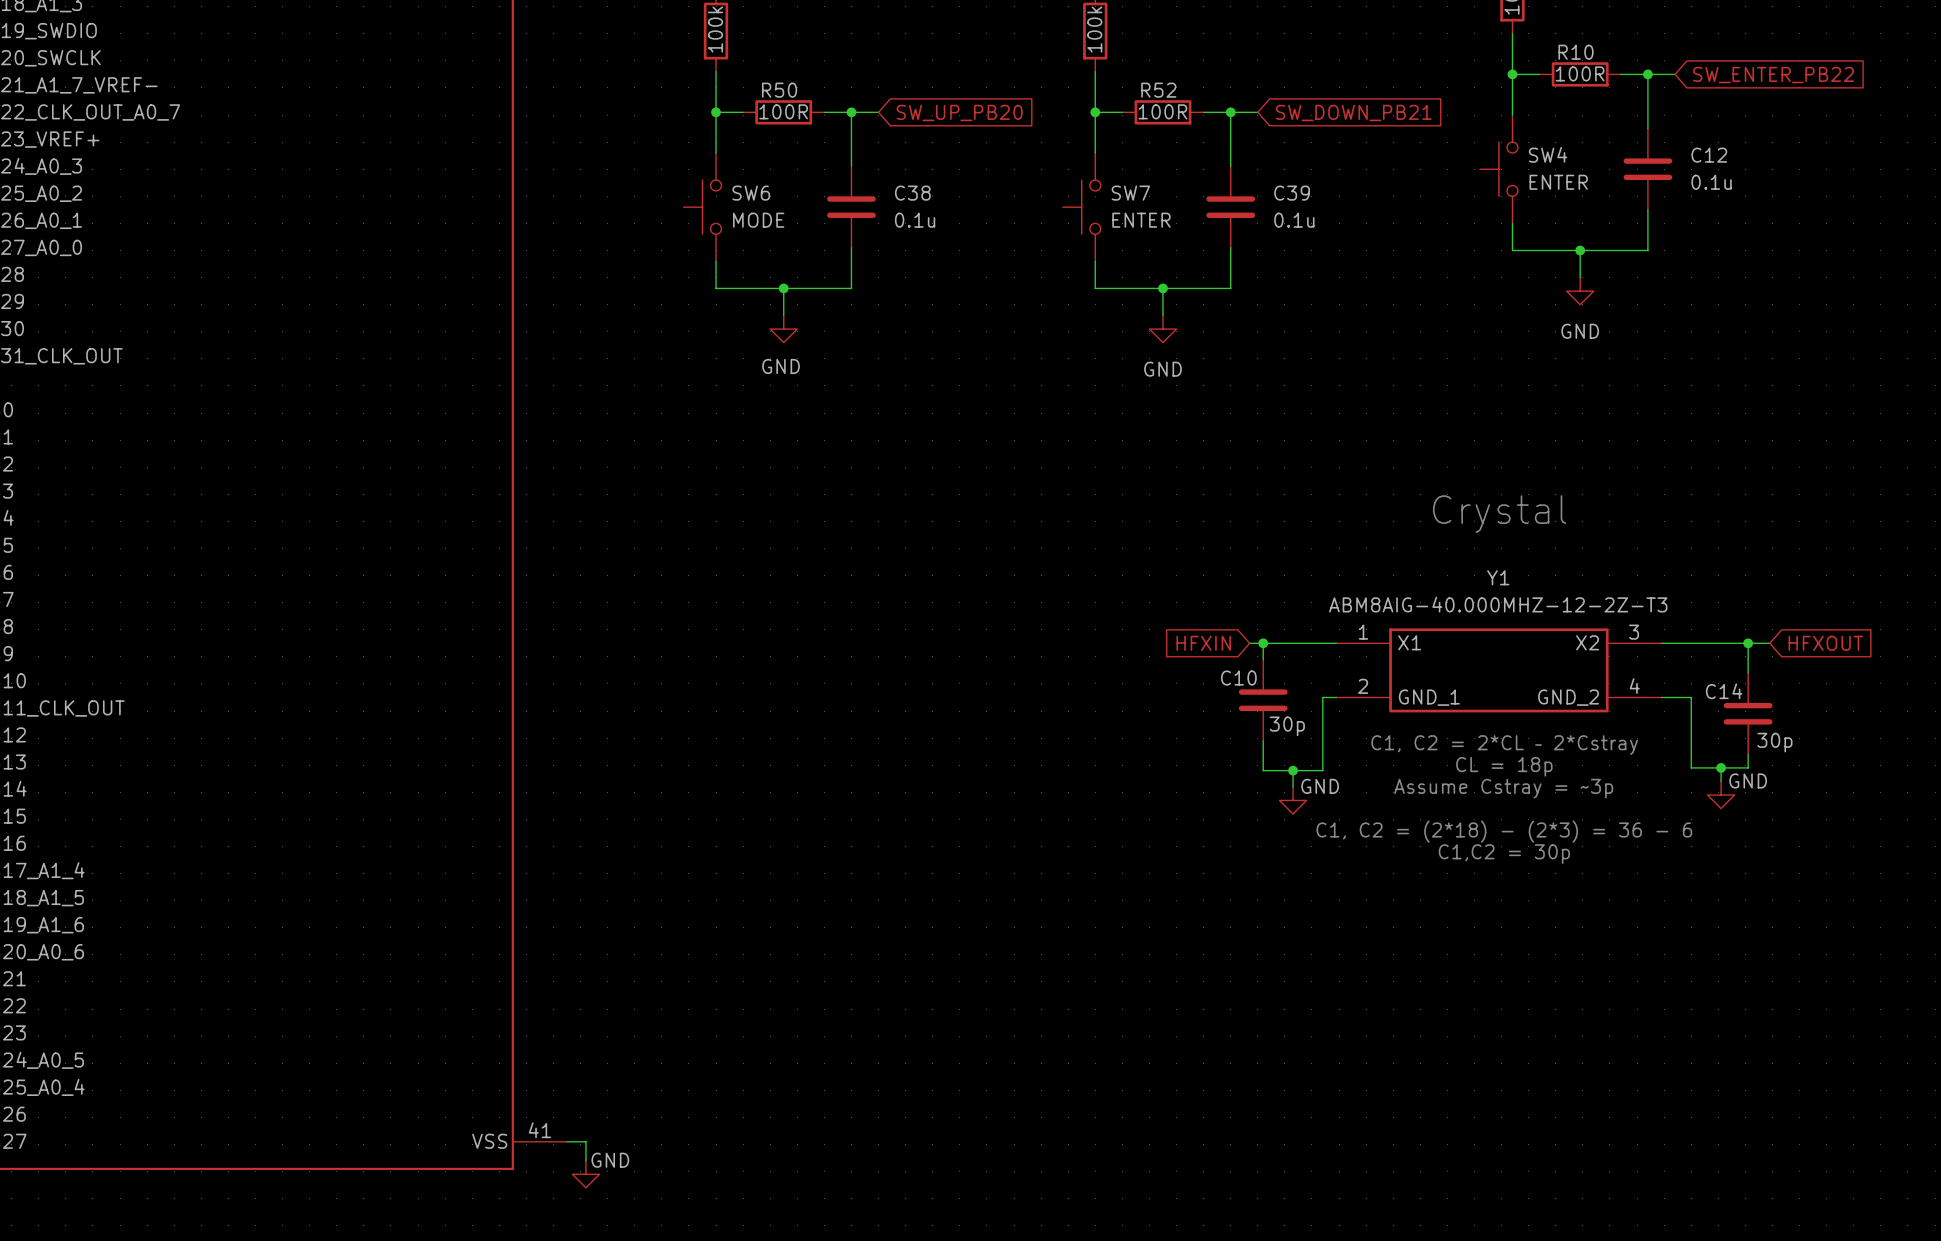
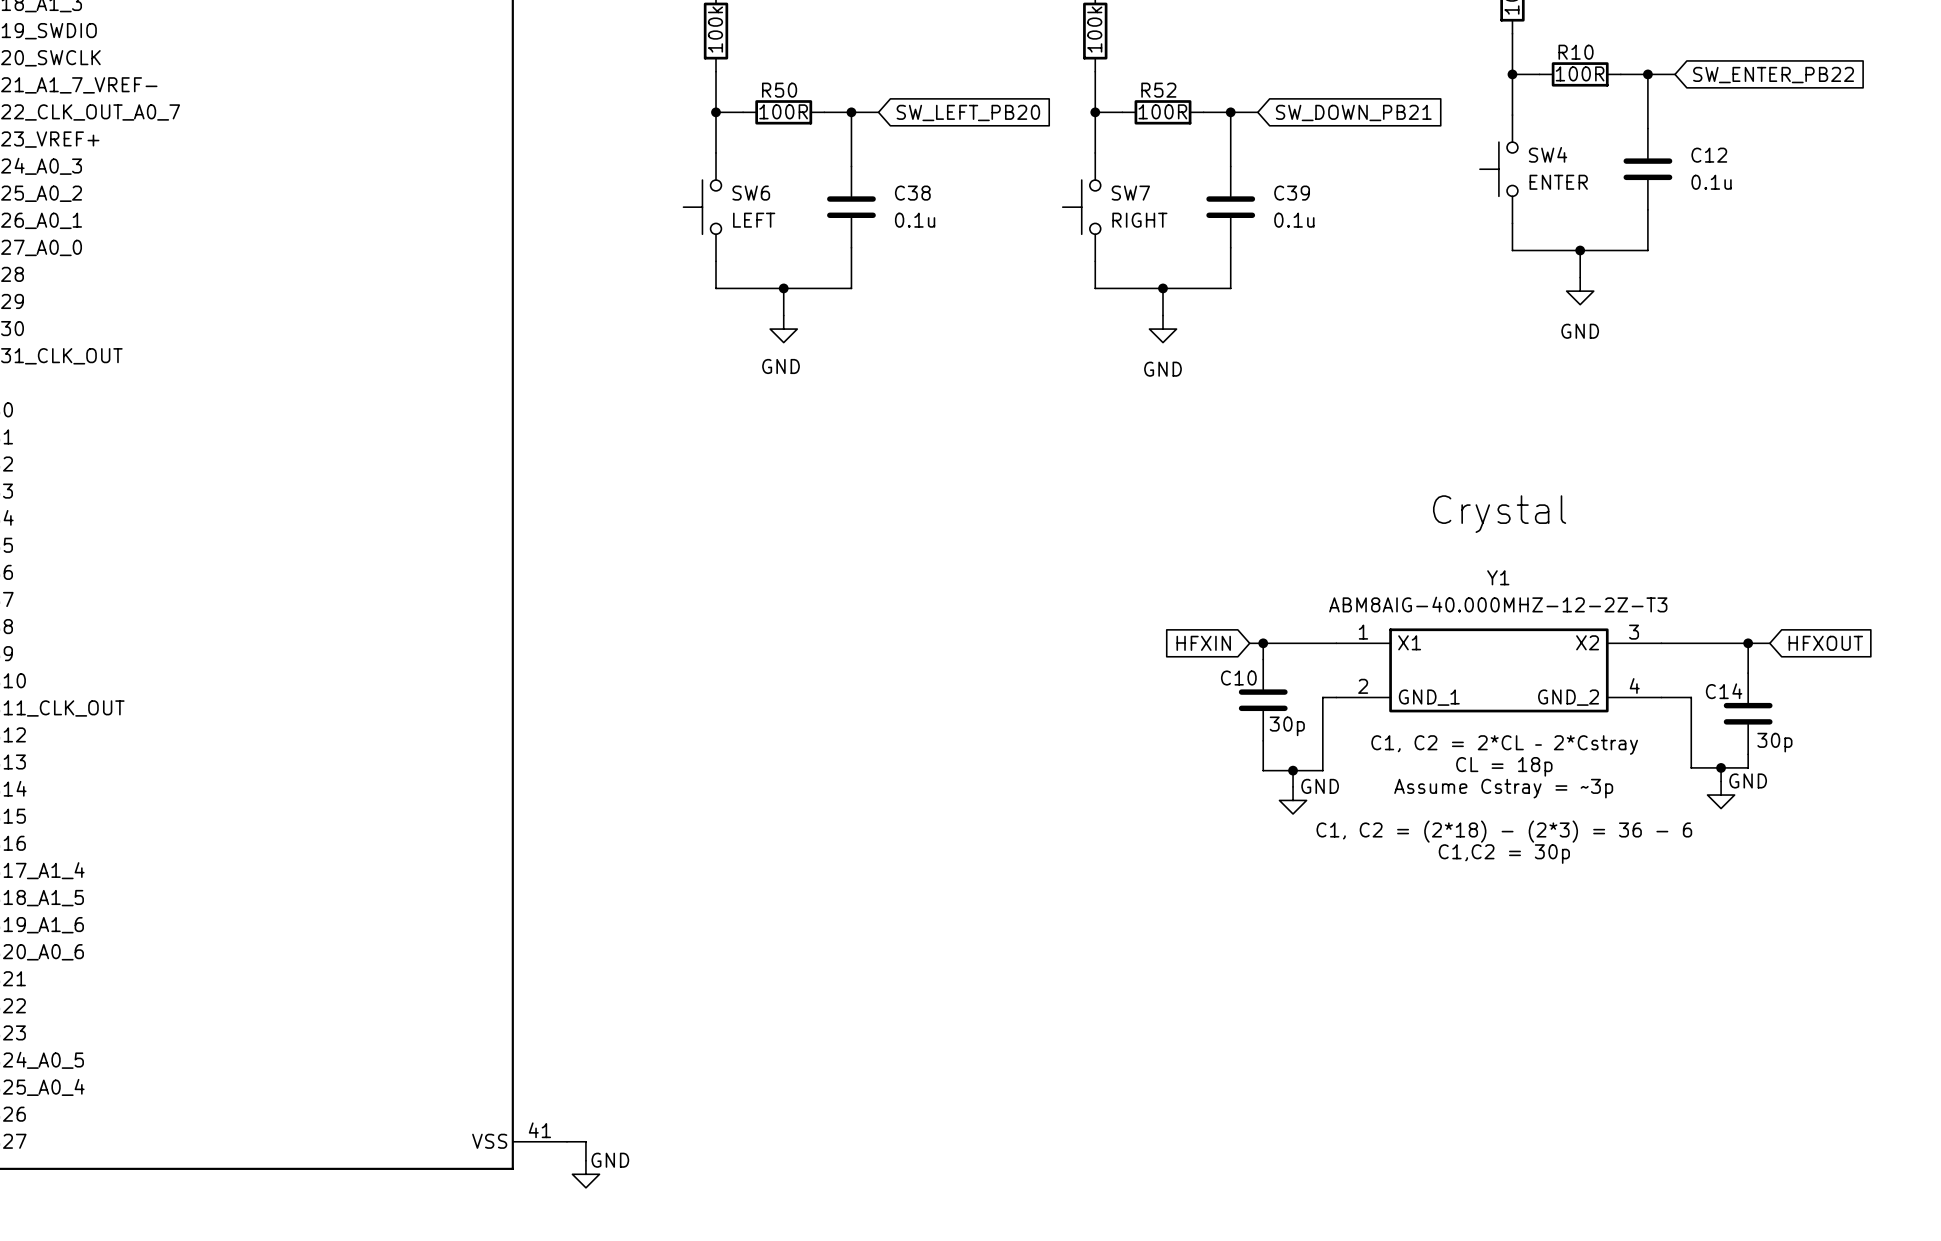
global label: SW_UP_PB20 (959, 112) -> SW_LEFT_PB20 (968, 112)
SW6 value: MODE (758, 220) -> LEFT (754, 220)
SW7 value: ENTER (1141, 220) -> RIGHT (1139, 220)

